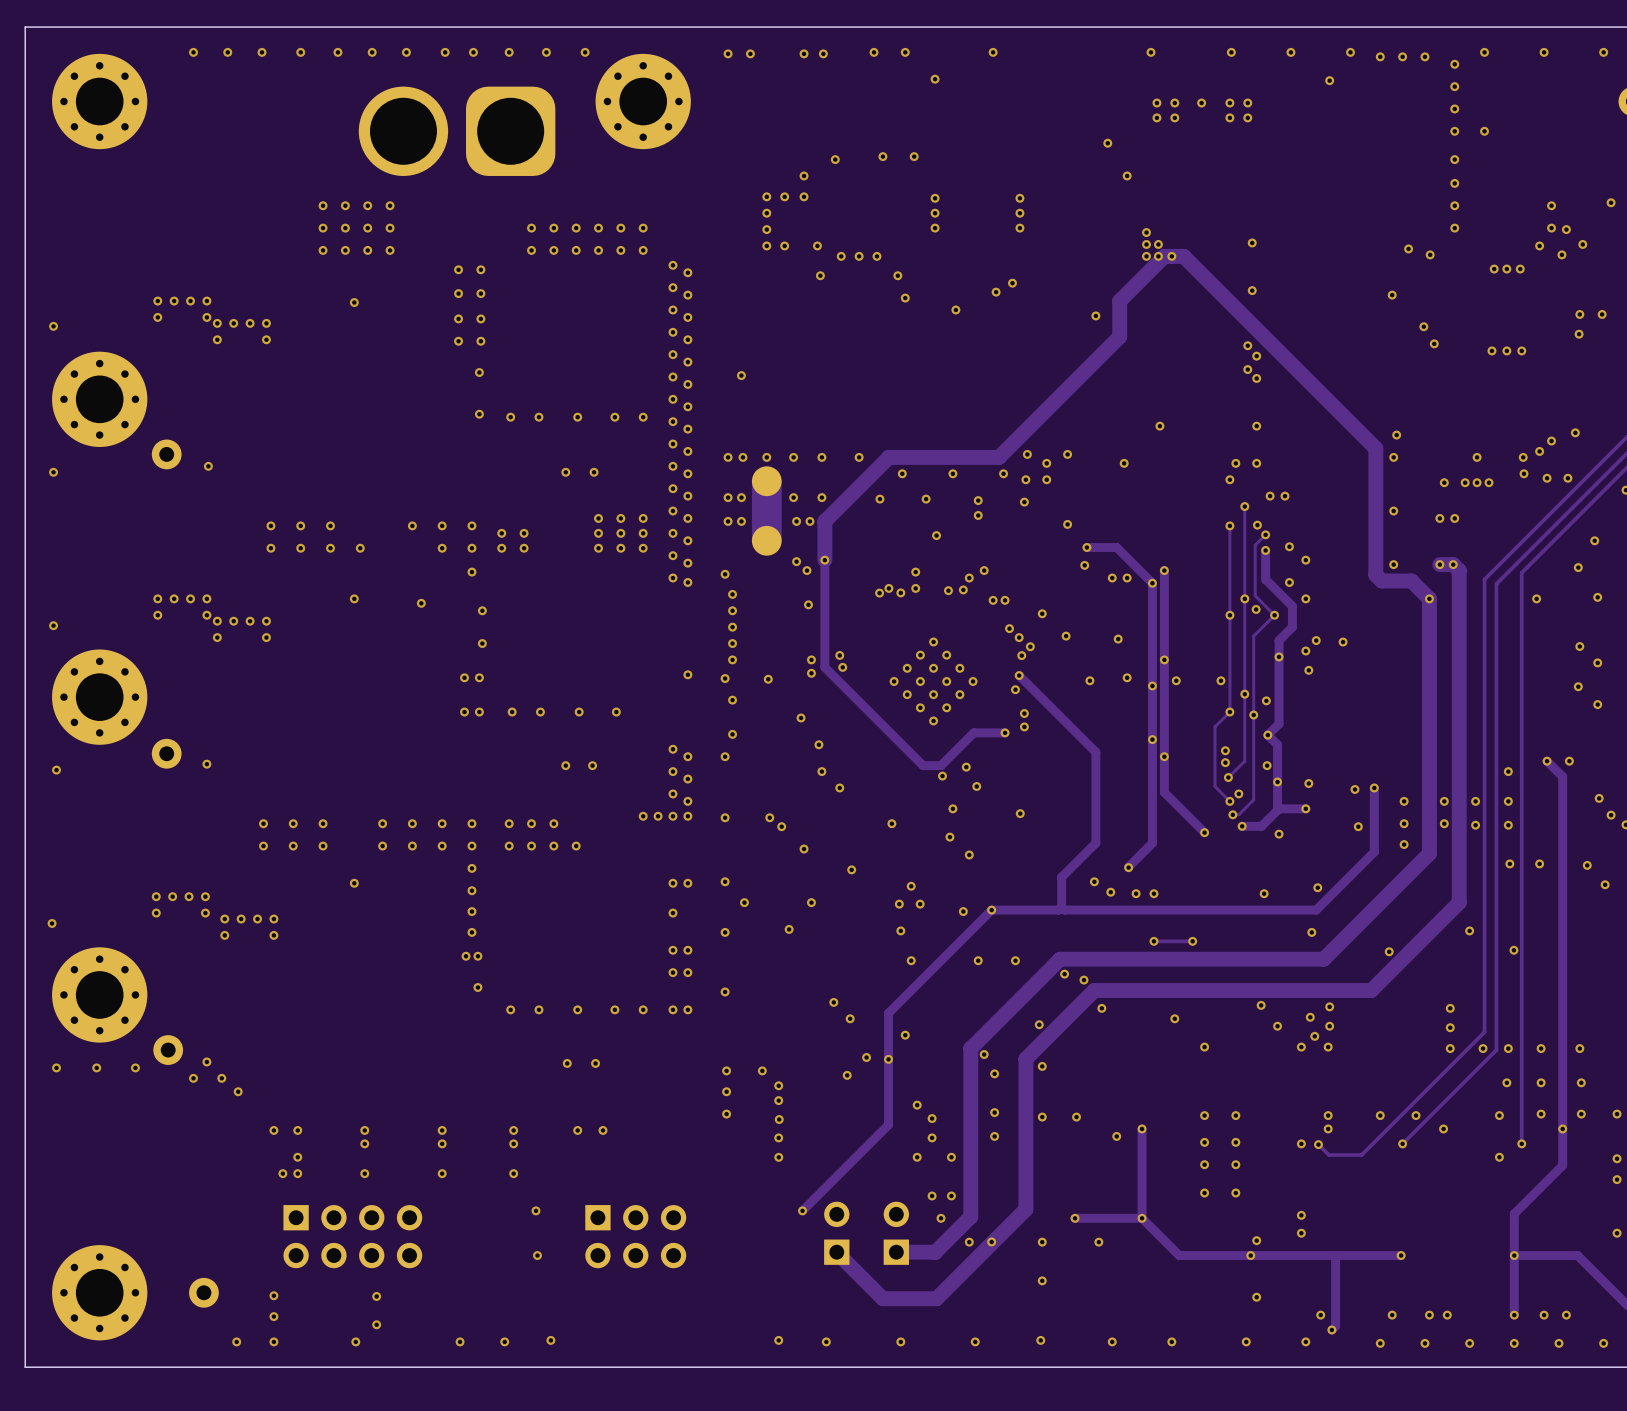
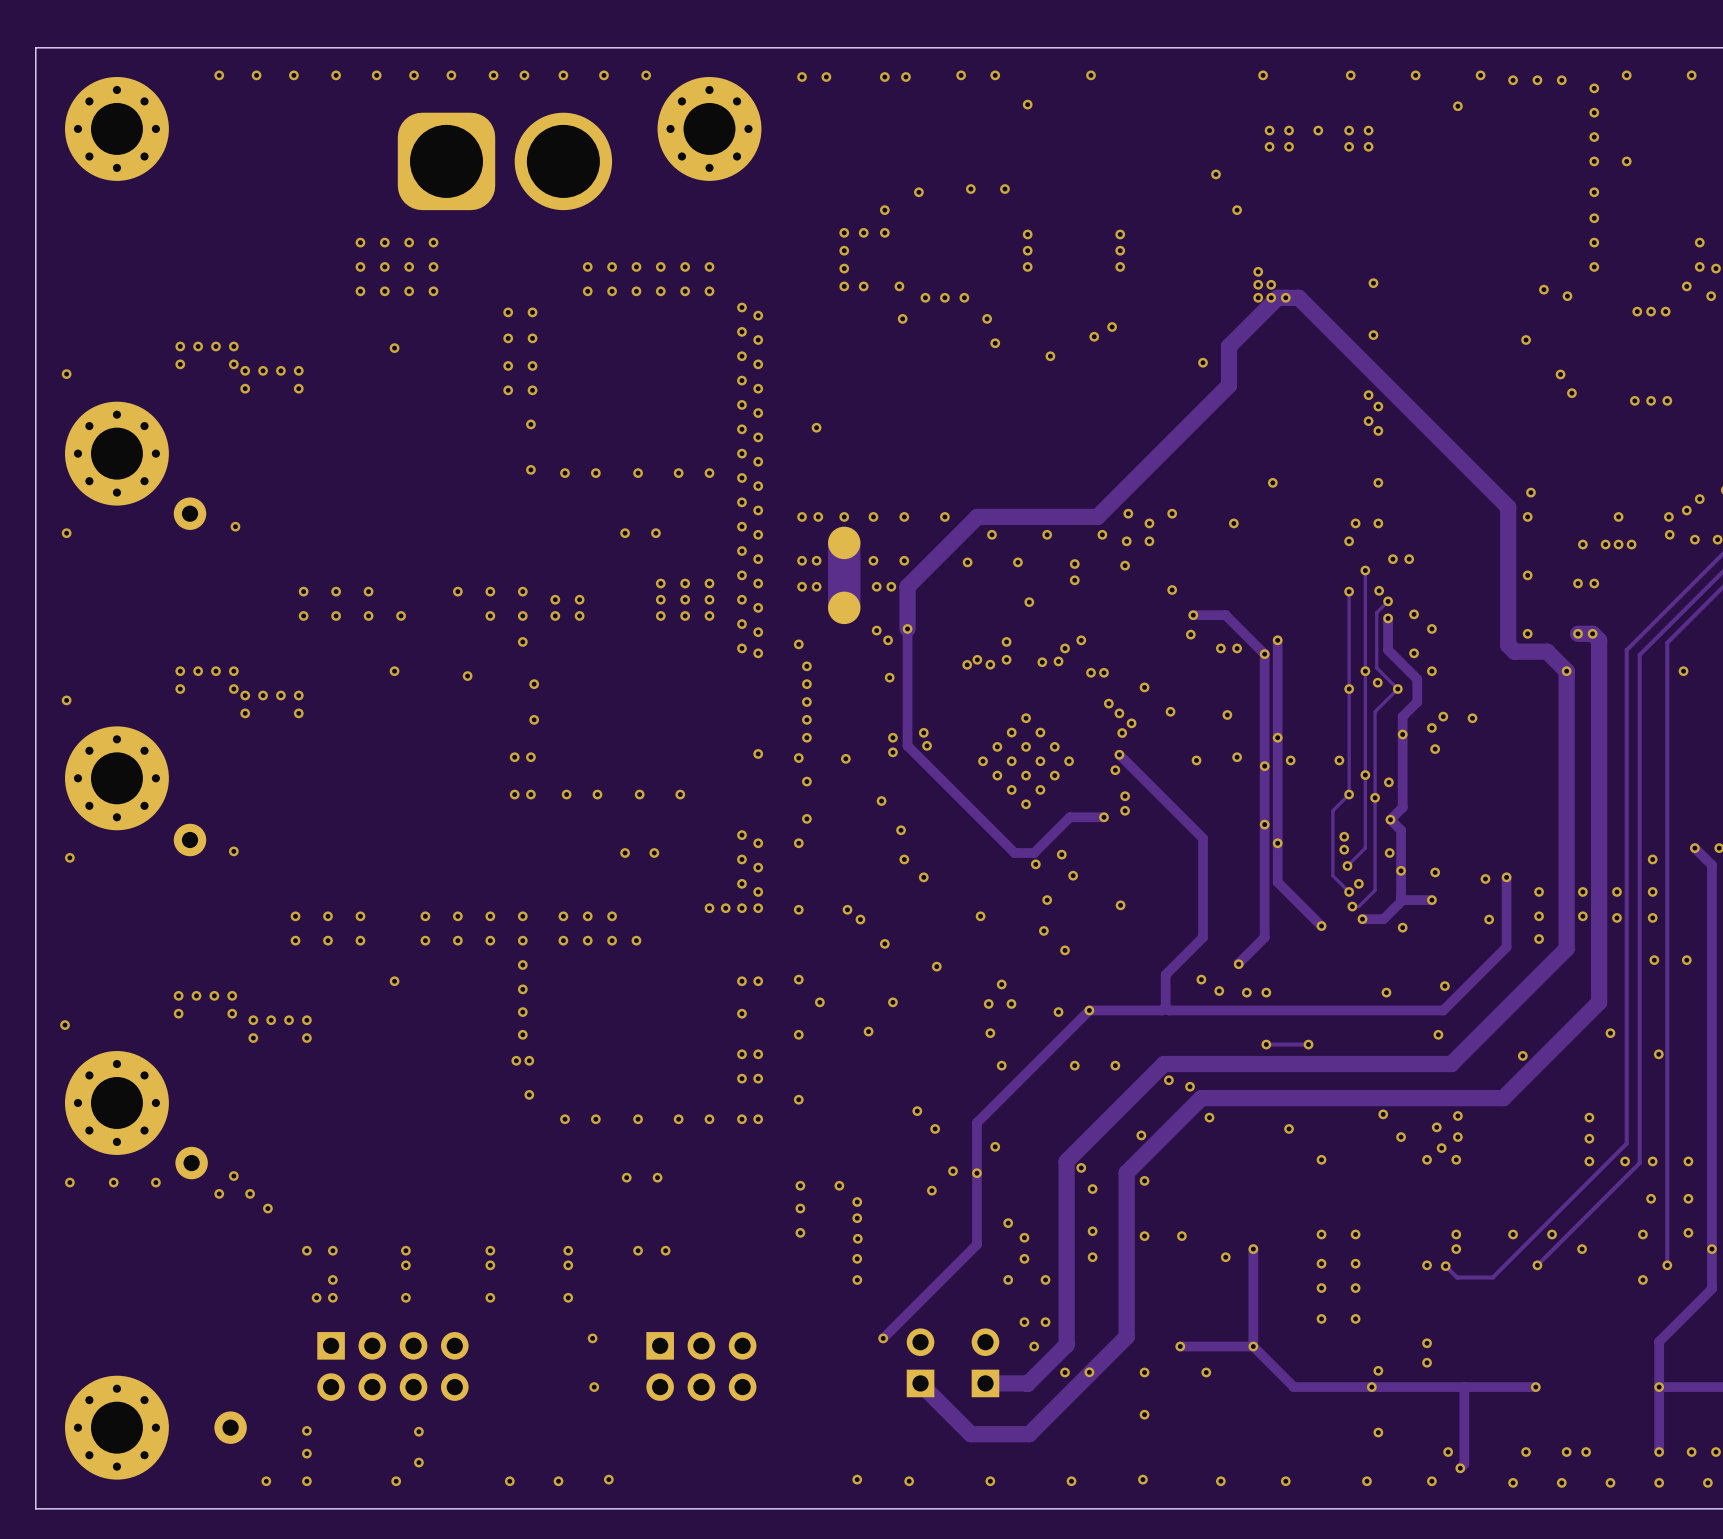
part rotation: 0° (457, 131) -> 180° (504, 161)

